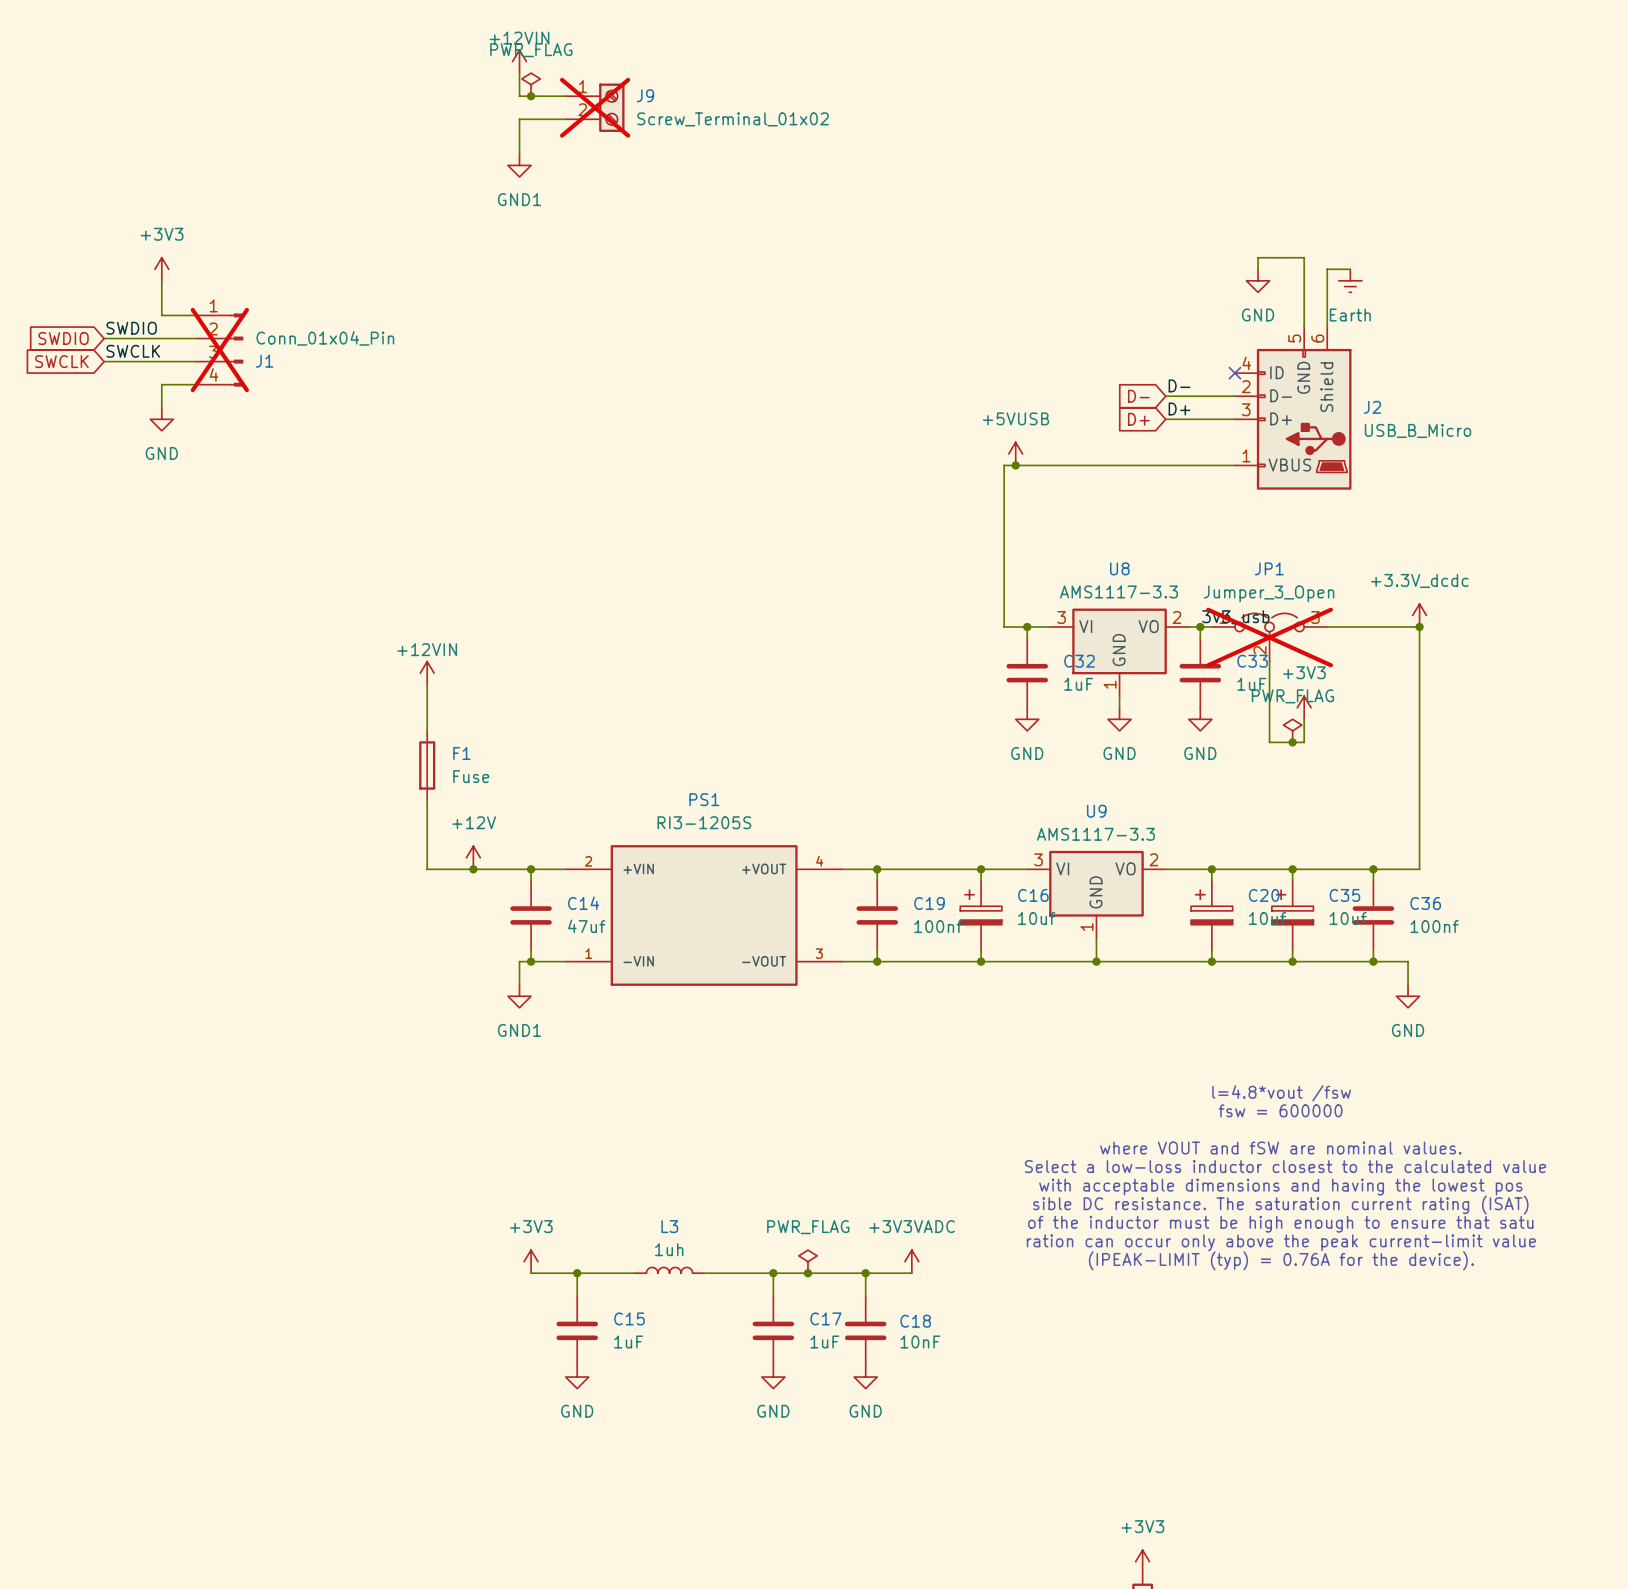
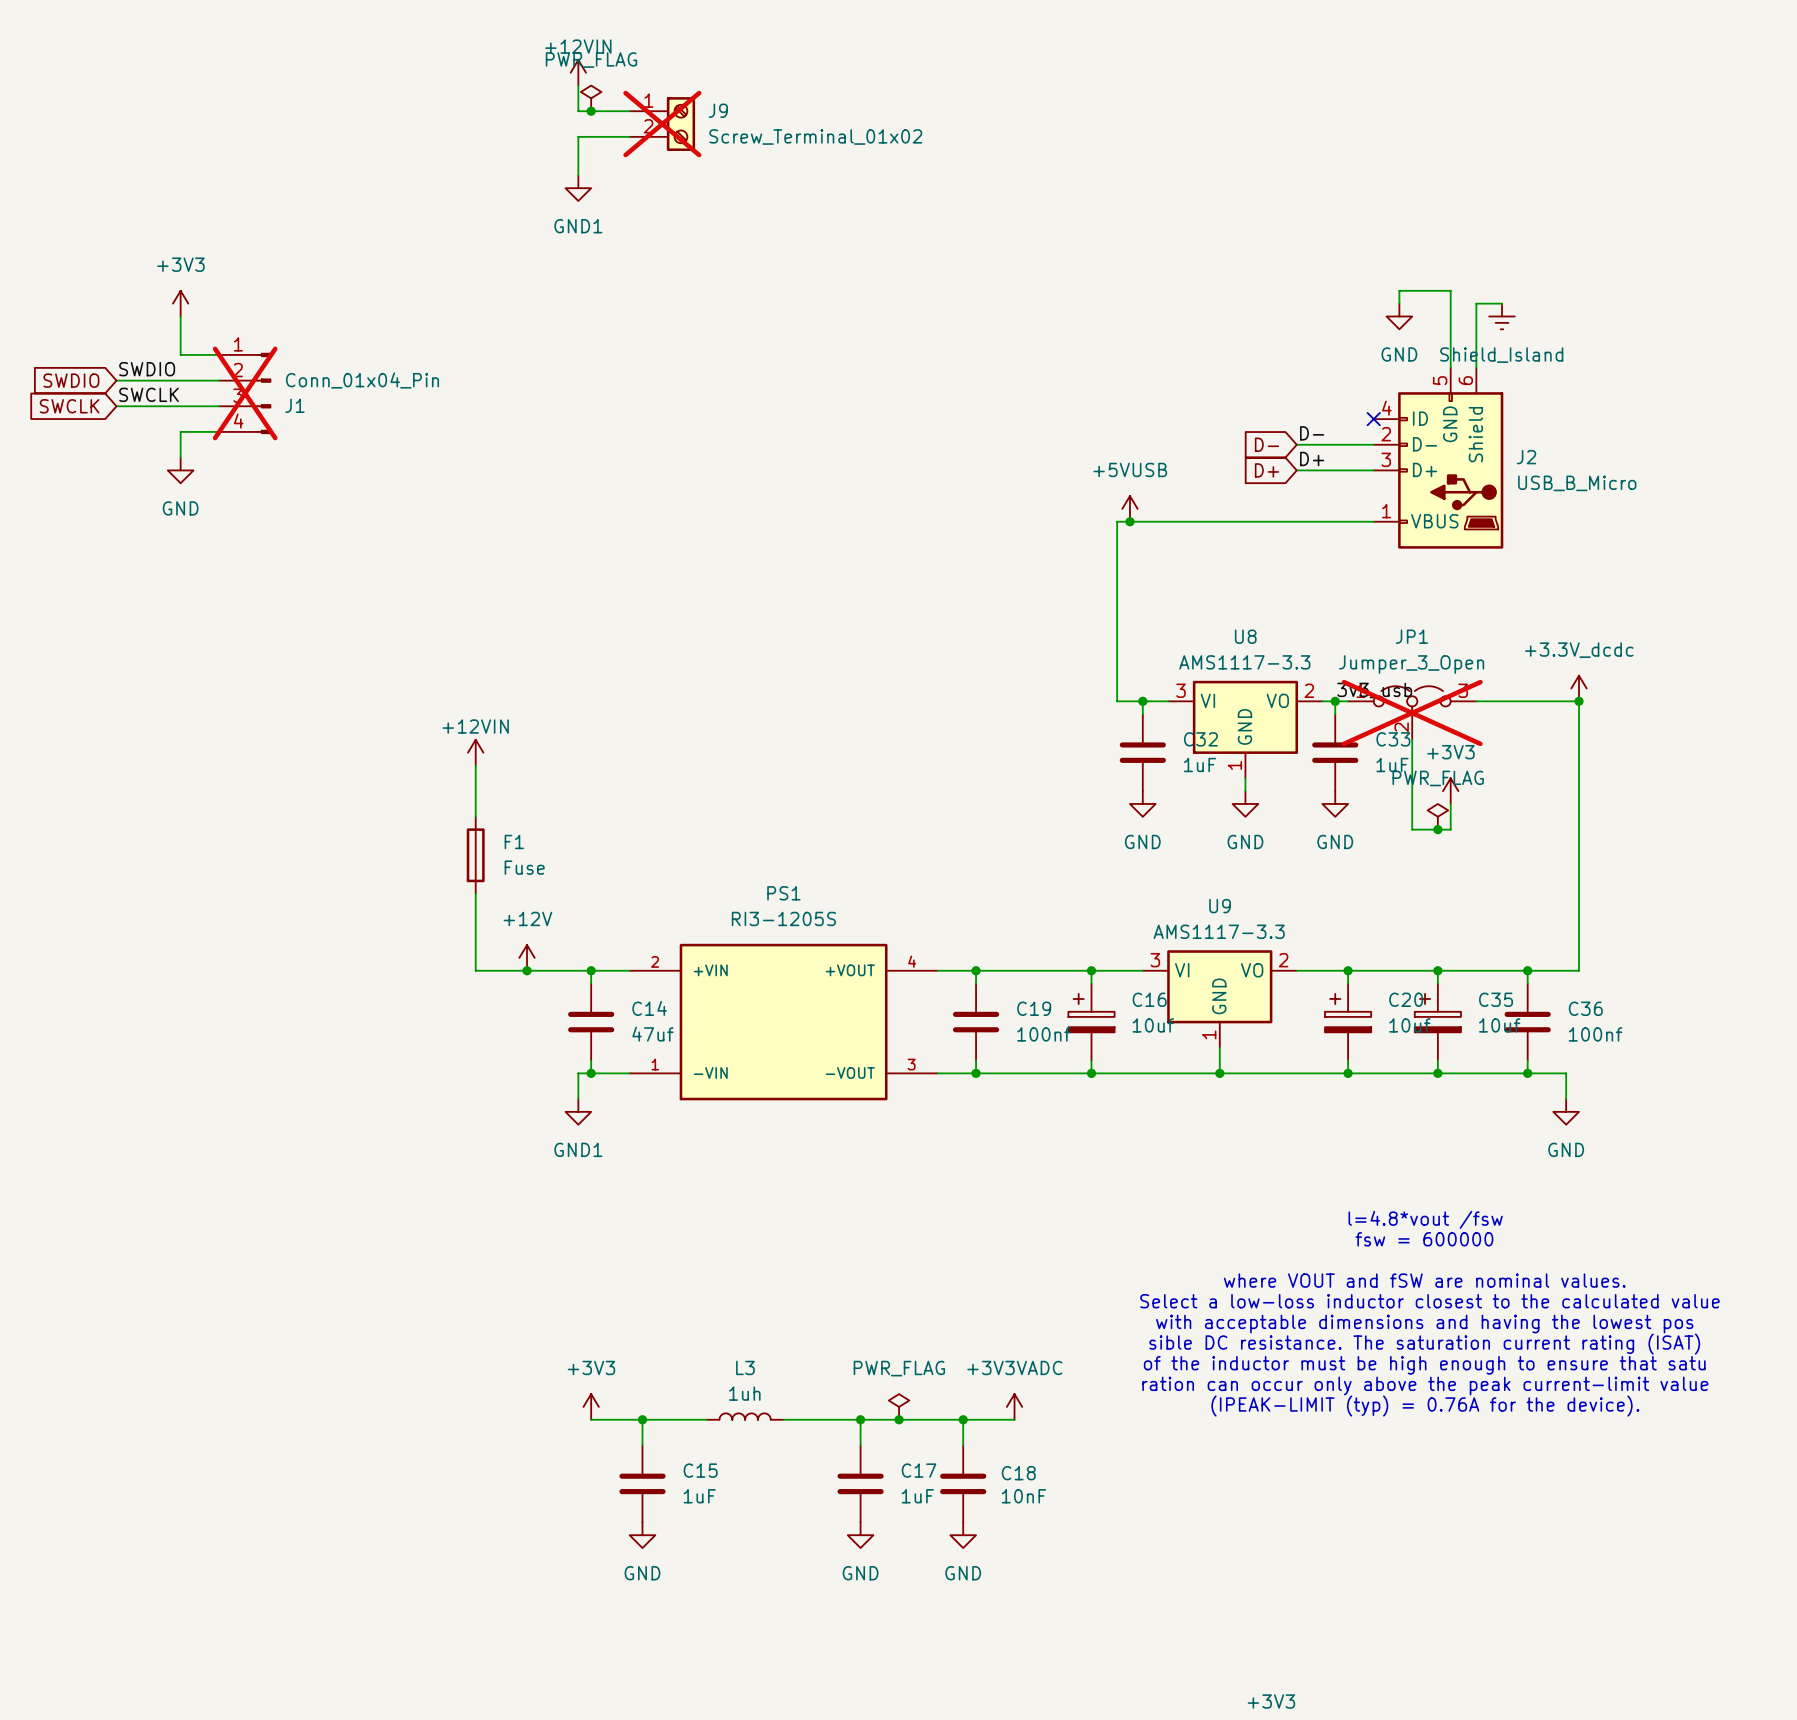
power symbol: Earth (1350, 280) -> Shield_Island (1502, 316)

